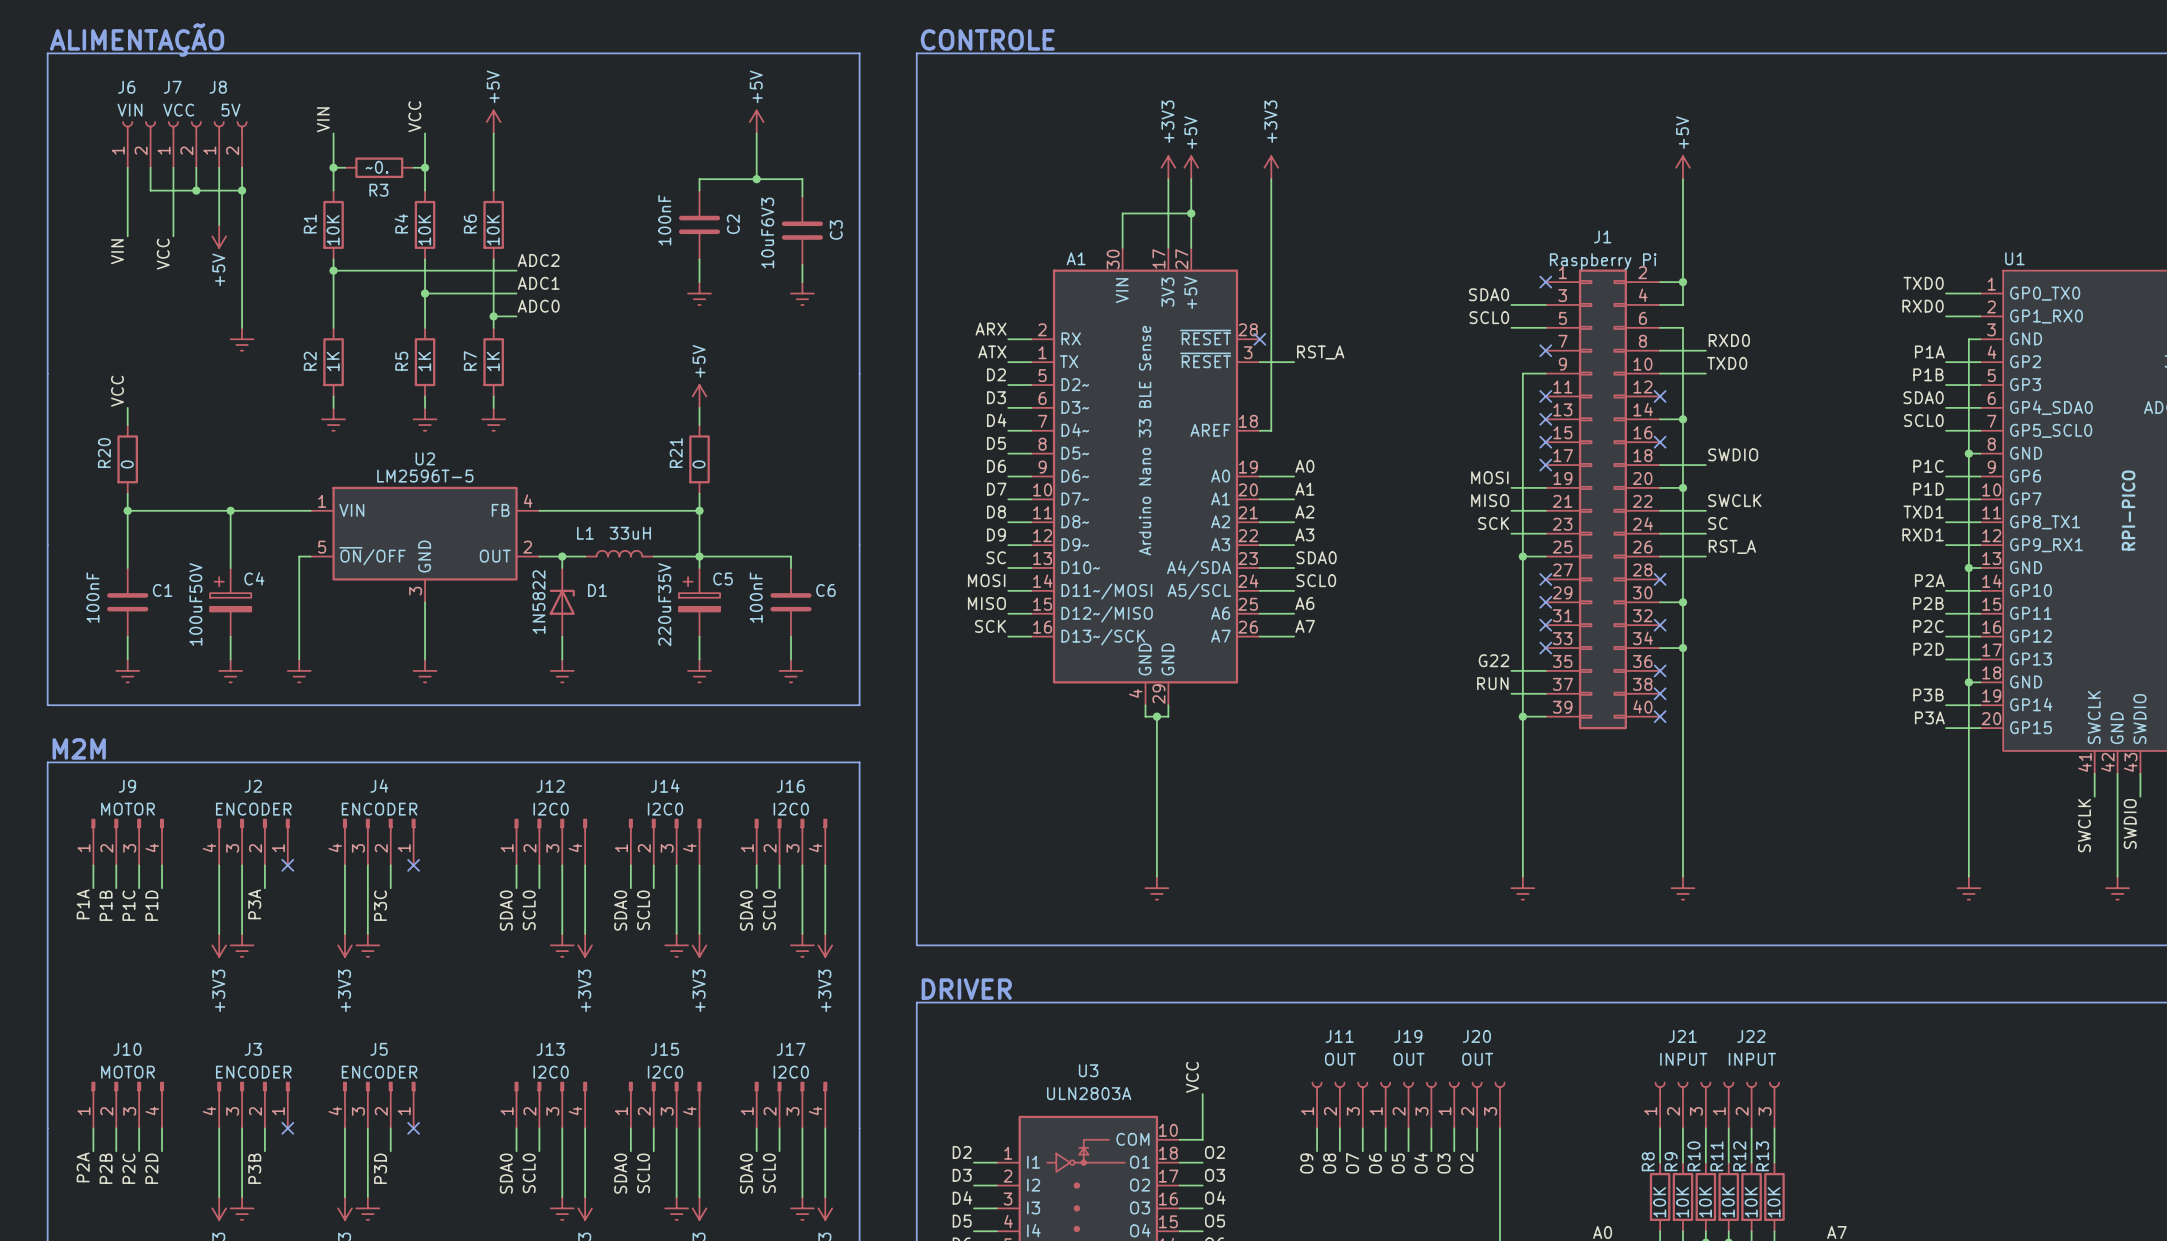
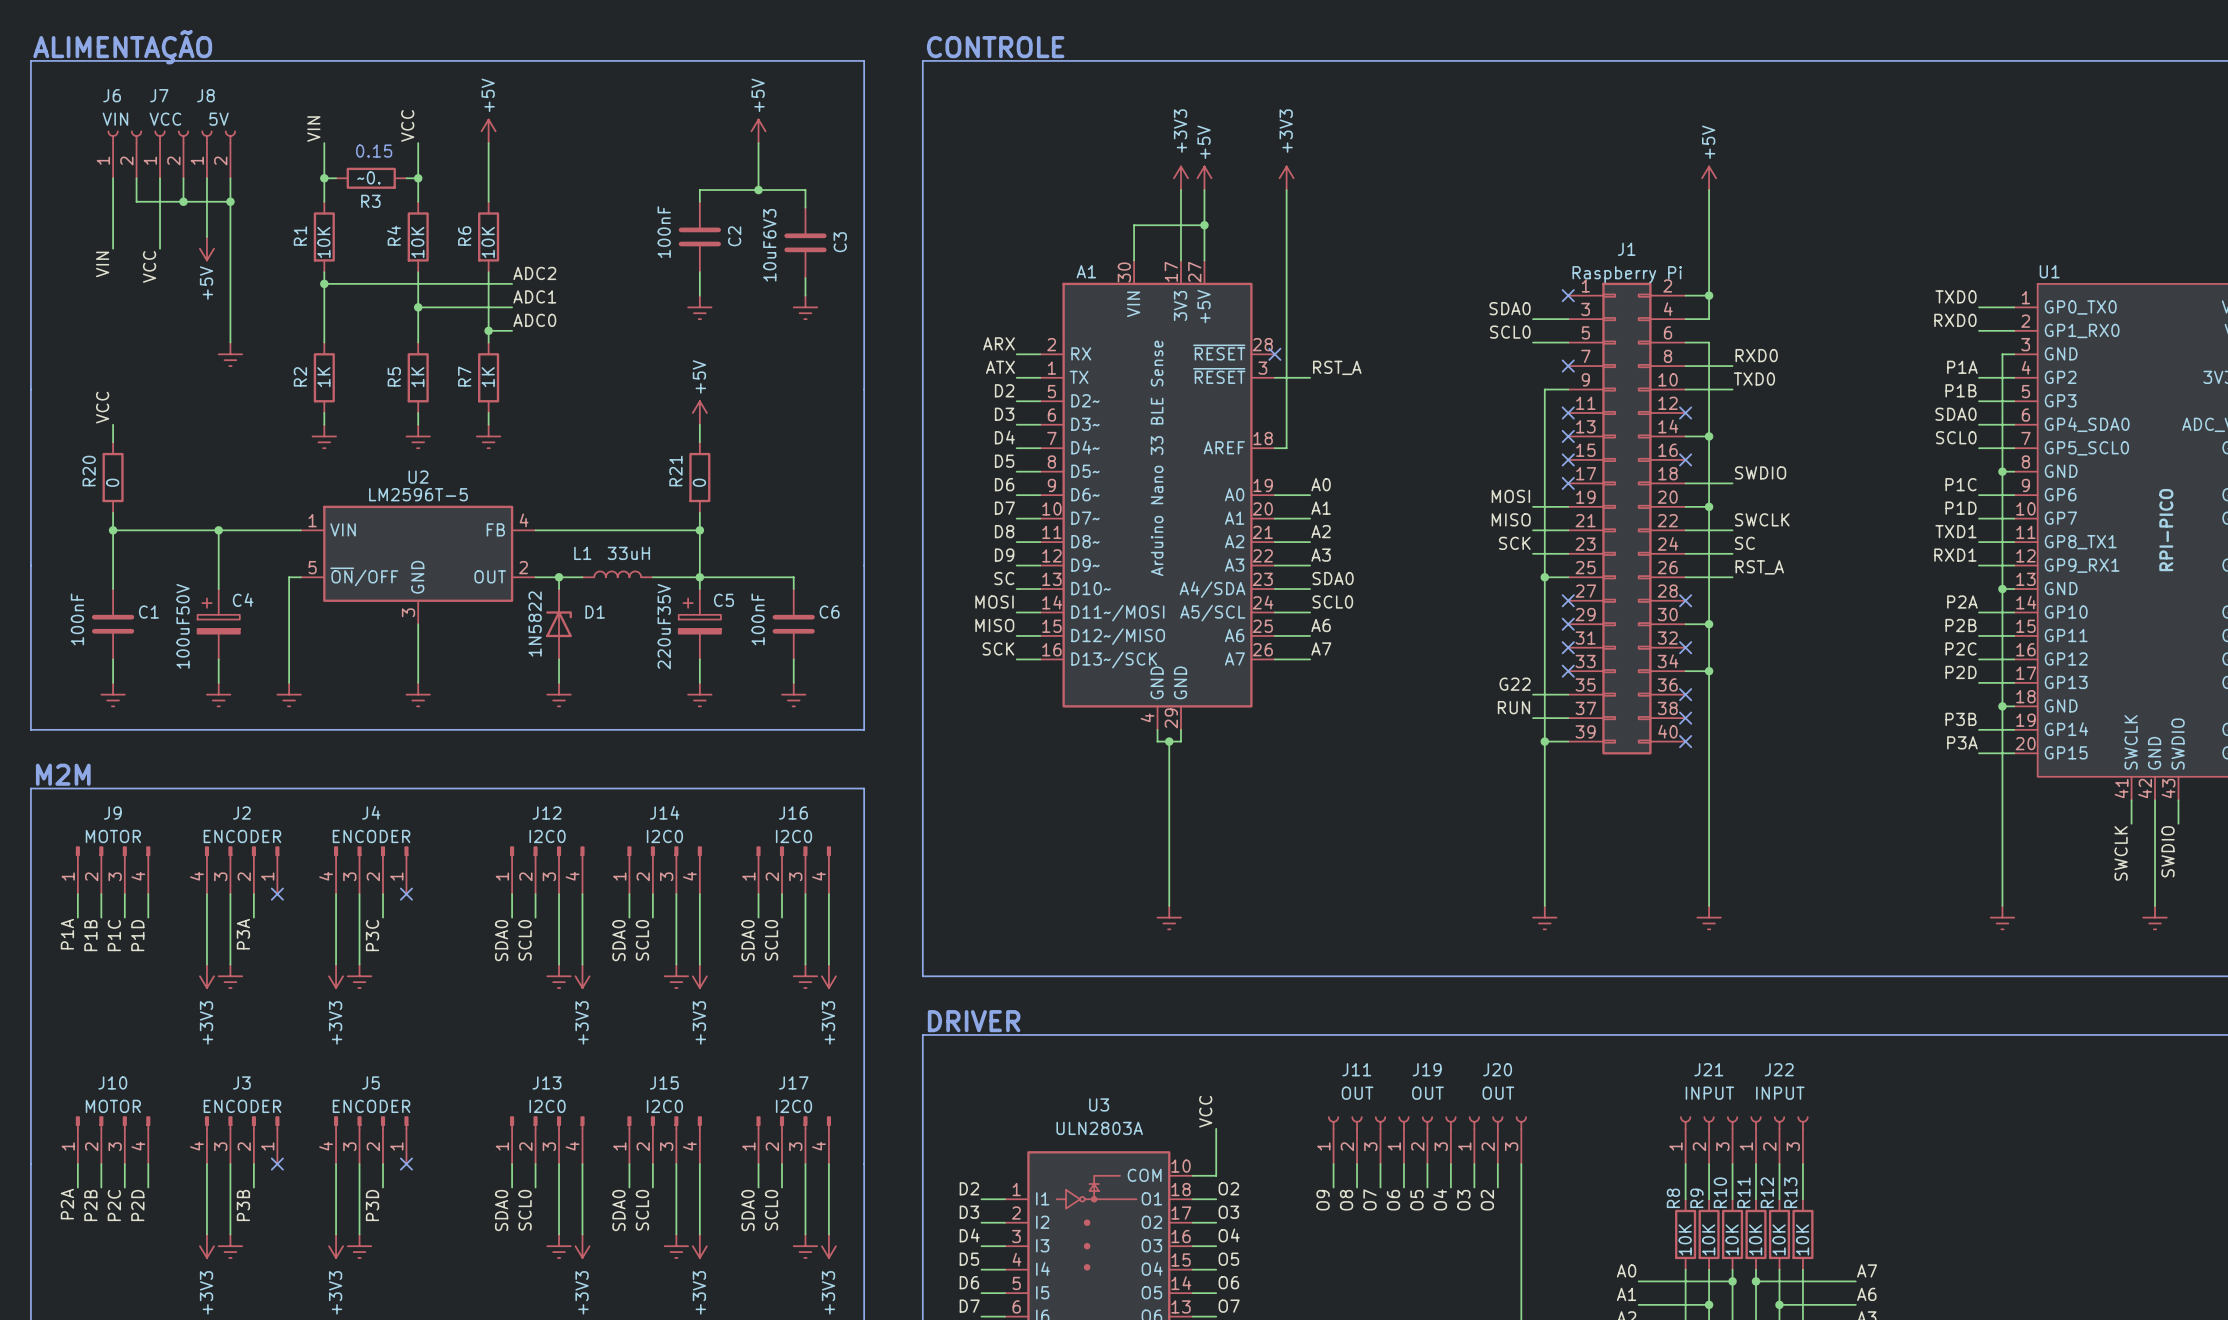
text: none -> 0.15 (374, 151)

